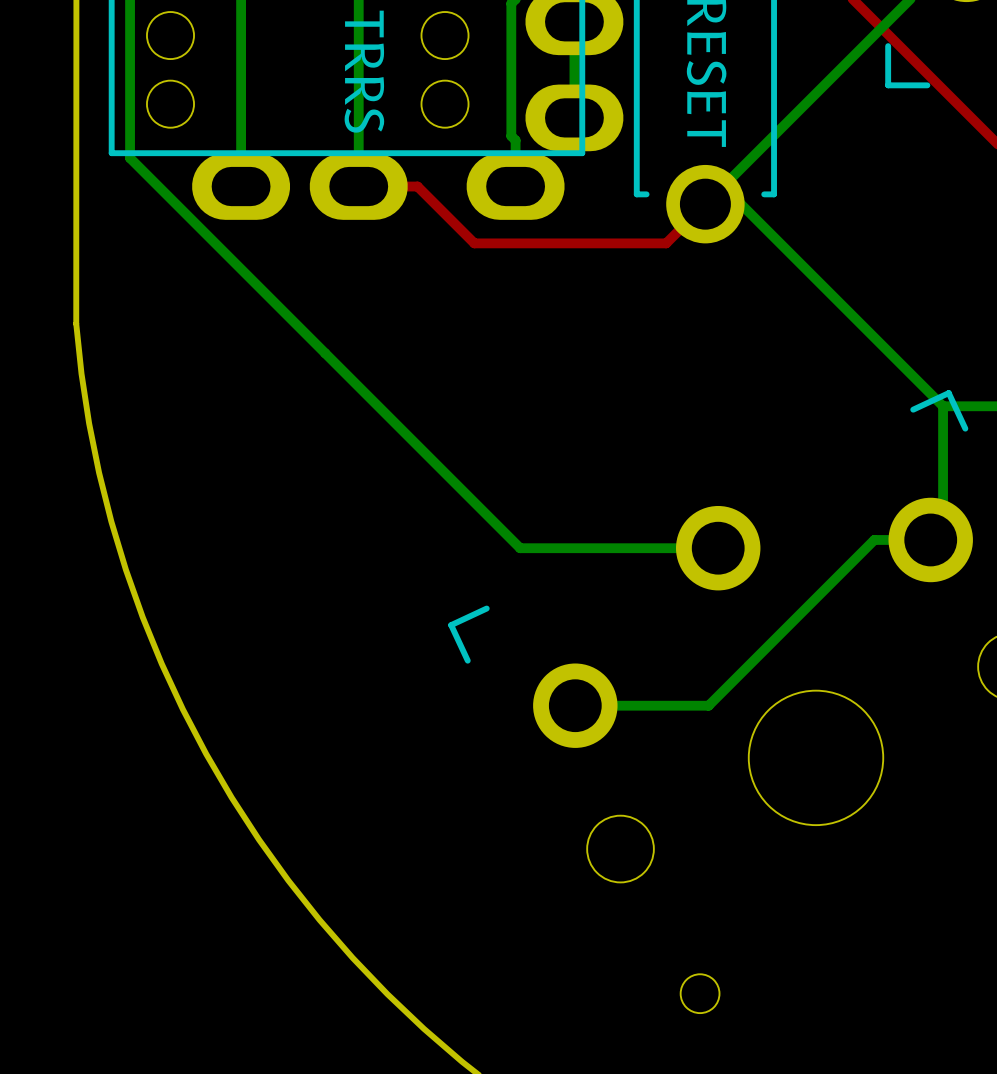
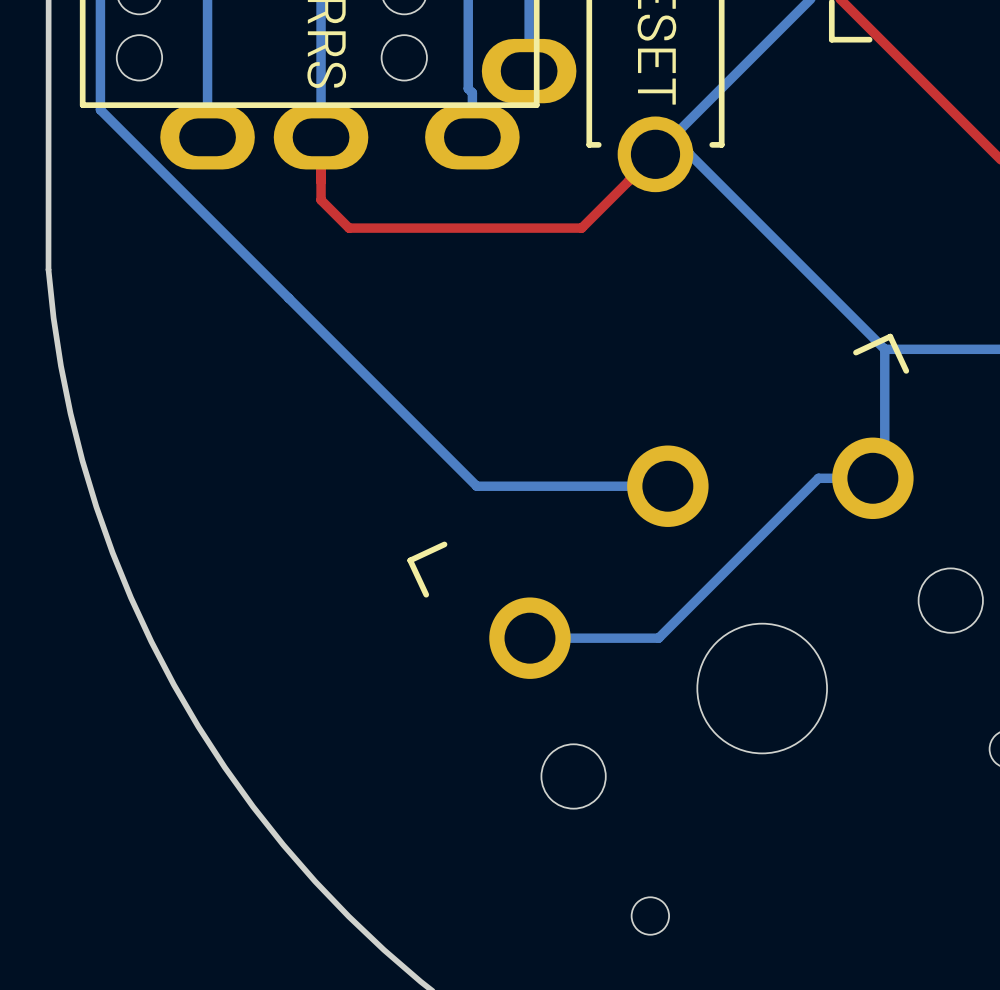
top track: (358, 186) (417, 186) (474, 243) (666, 243) -> (321, 137) (321, 200) (349, 228) (581, 228) (617, 192)

